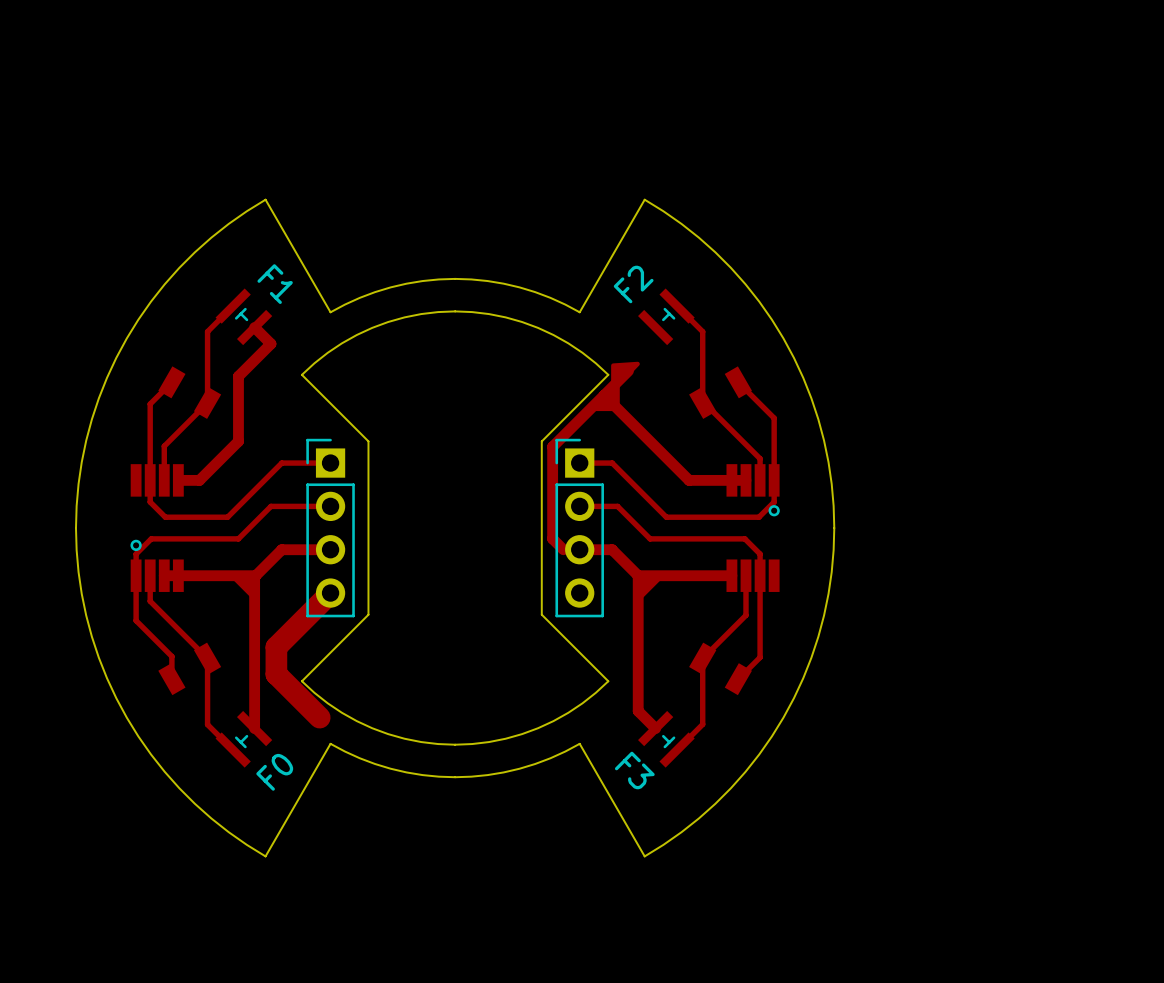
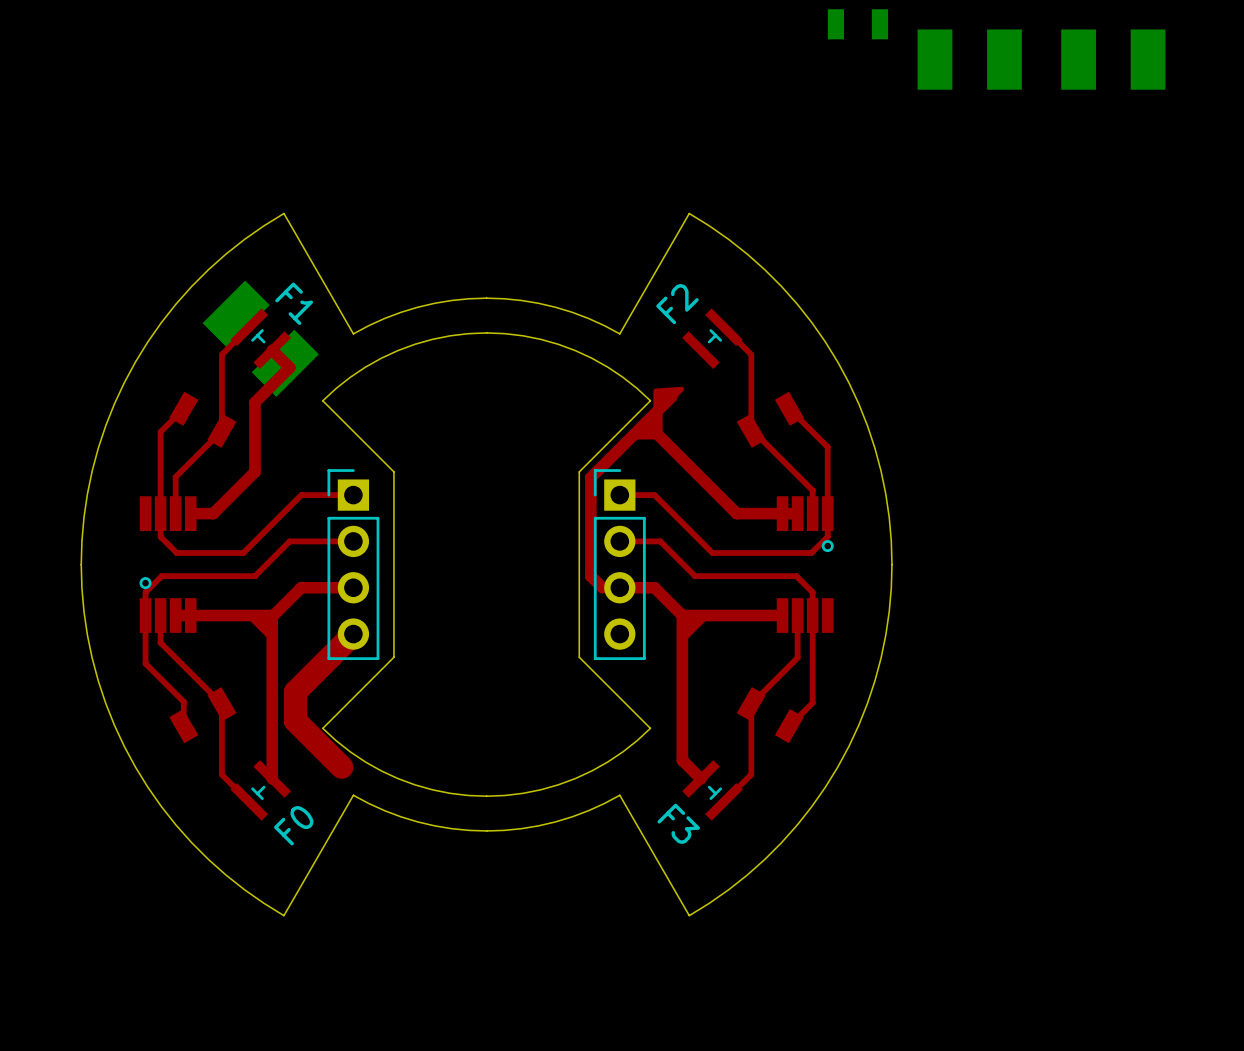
part: none -> (857, 24)
part: none -> (969, 59)
part: none -> (1113, 59)
part: none -> (260, 338)

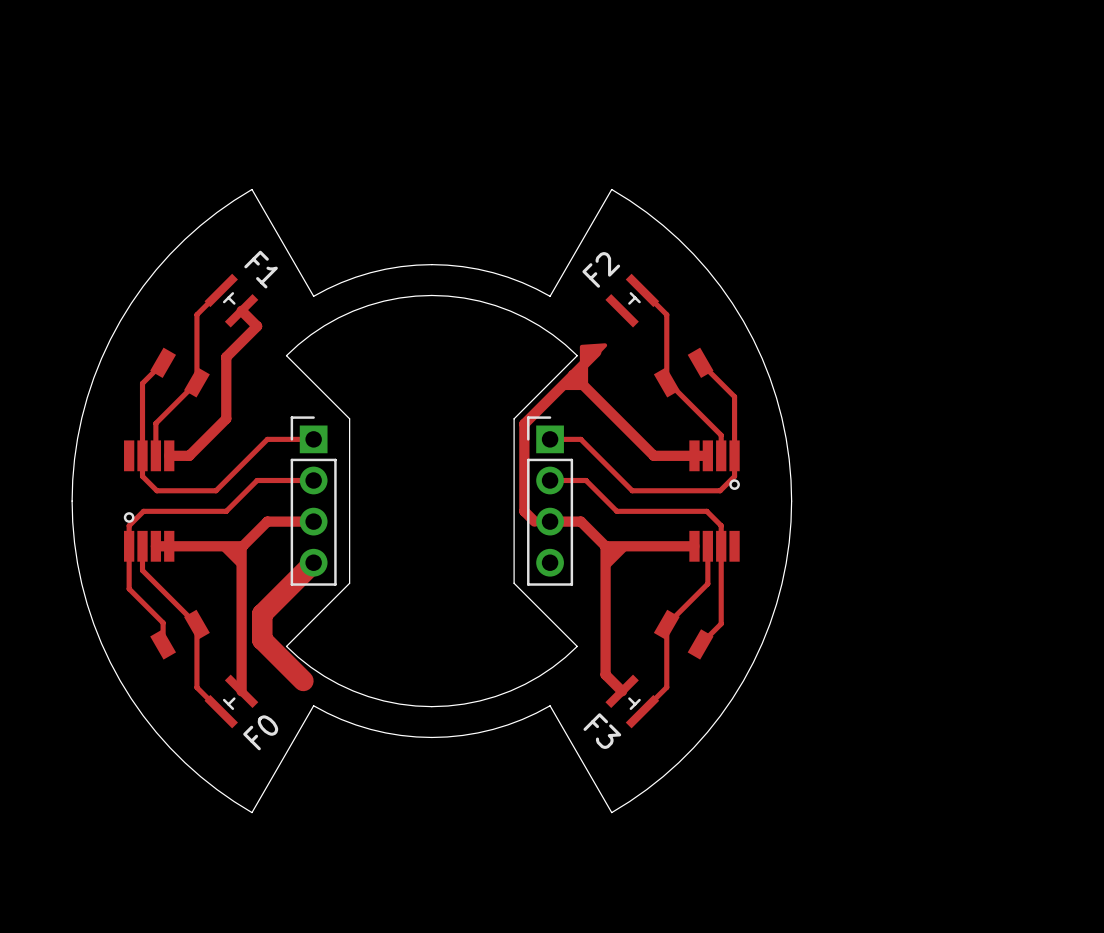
part: (857, 24) -> none
part: (969, 59) -> none
part: (1113, 59) -> none
part: (260, 338) -> none

